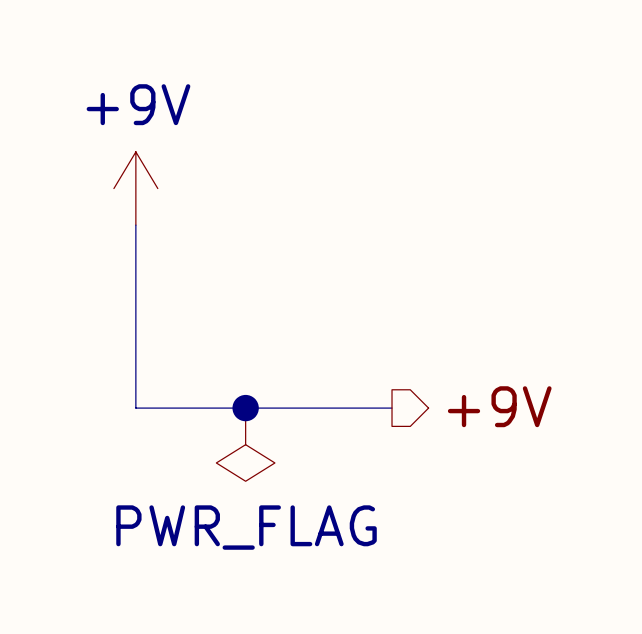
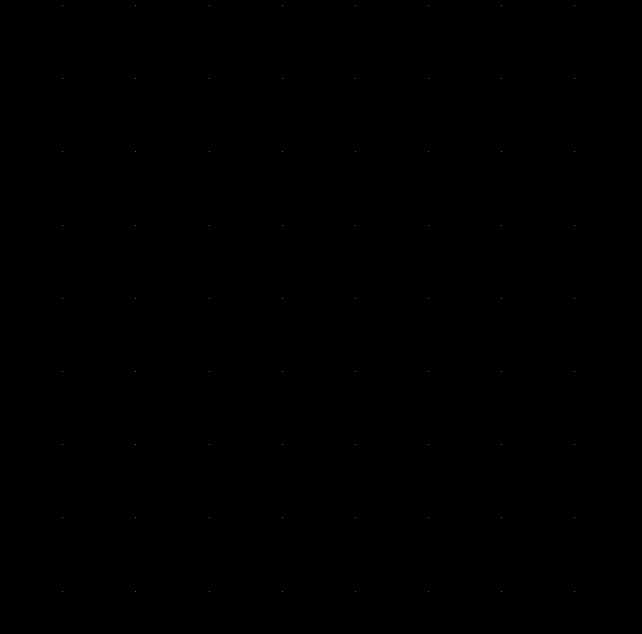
power symbol: +9V (135, 188) -> none
wire: (135, 225) (135, 408) (392, 408) -> none
hierarchical label: +9V (499, 406) -> none
junction: (245, 408) -> none
power symbol: PWR_FLAG (245, 444) -> none

